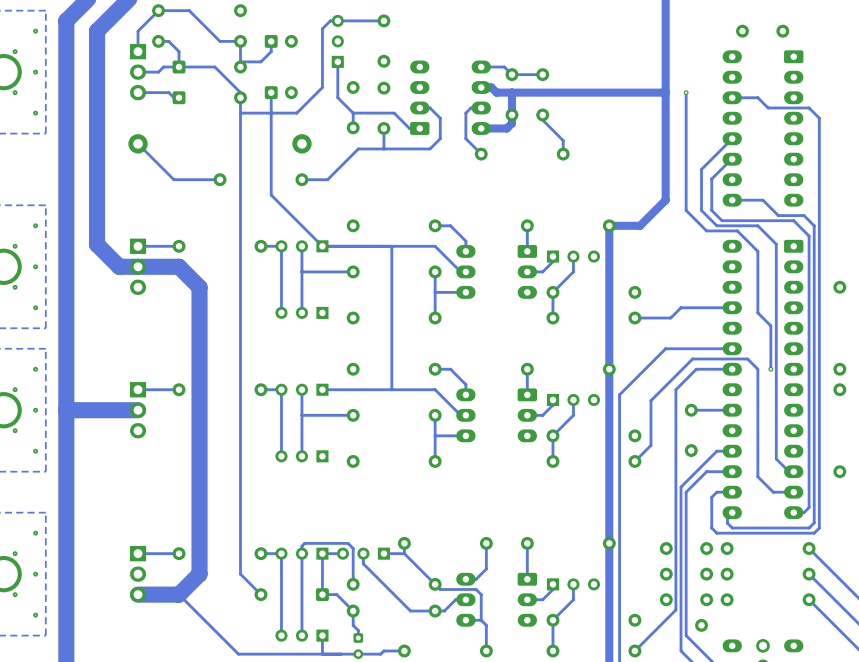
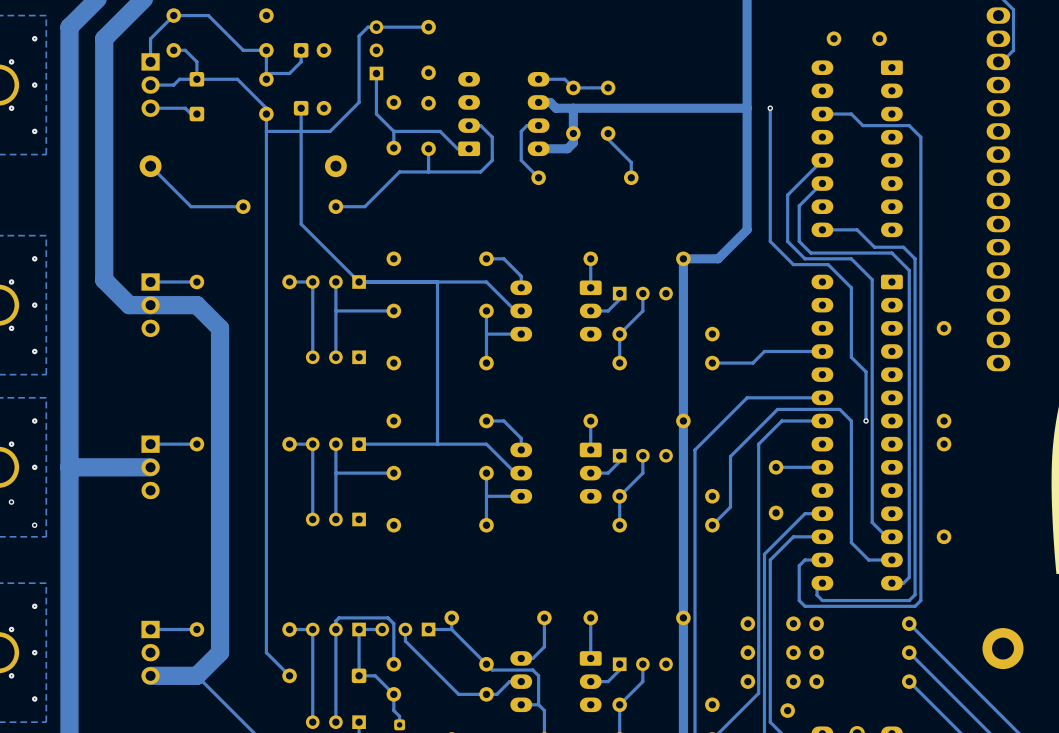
via: (15, 430) -> none
via: none -> (11, 502)
via: (35, 451) -> none
via: none -> (34, 525)

